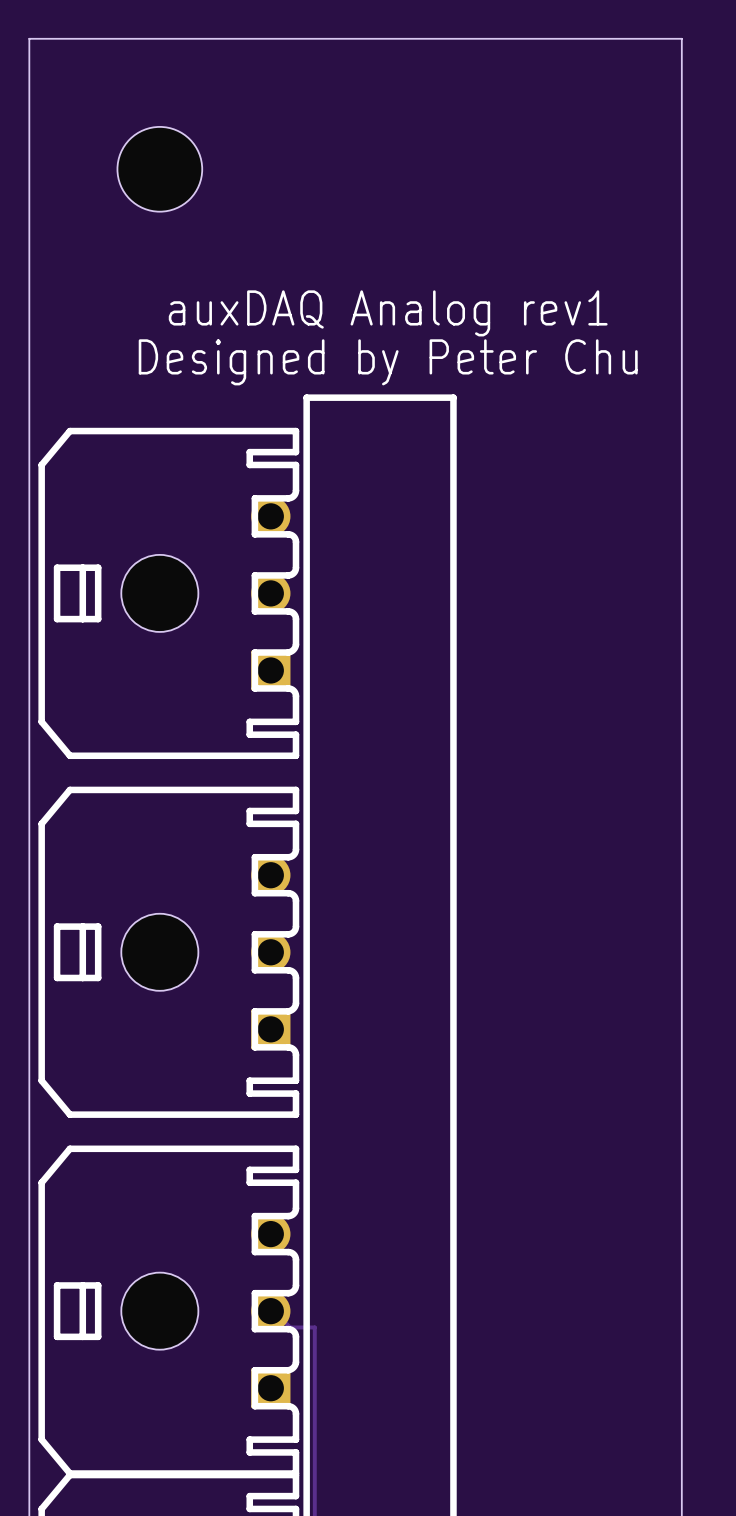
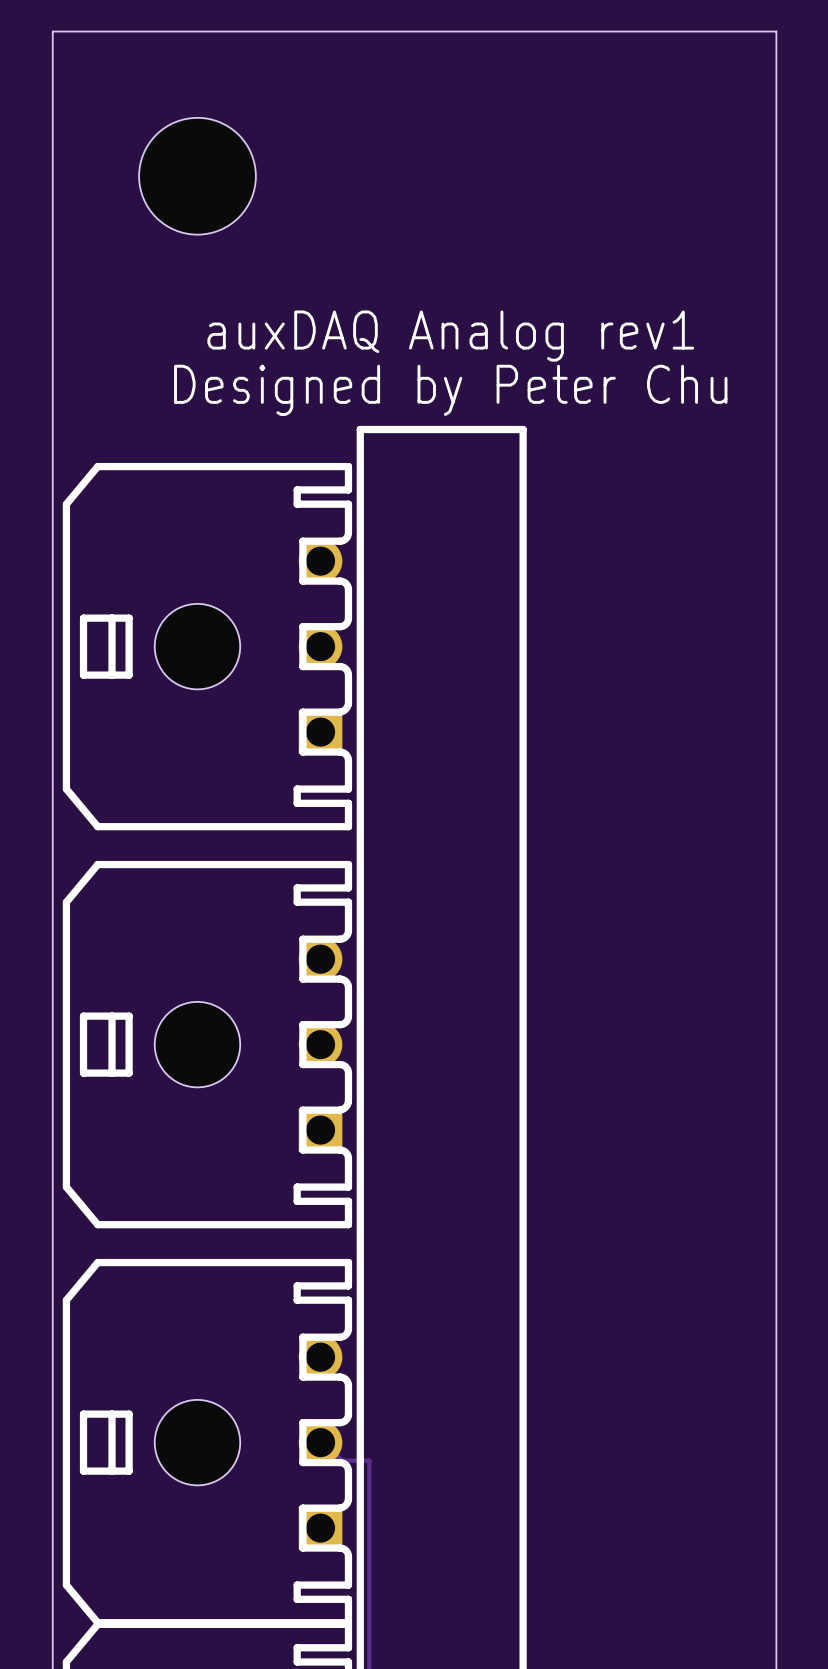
hole size: [117, 126, 203, 212] -> [139, 117, 256, 235]

